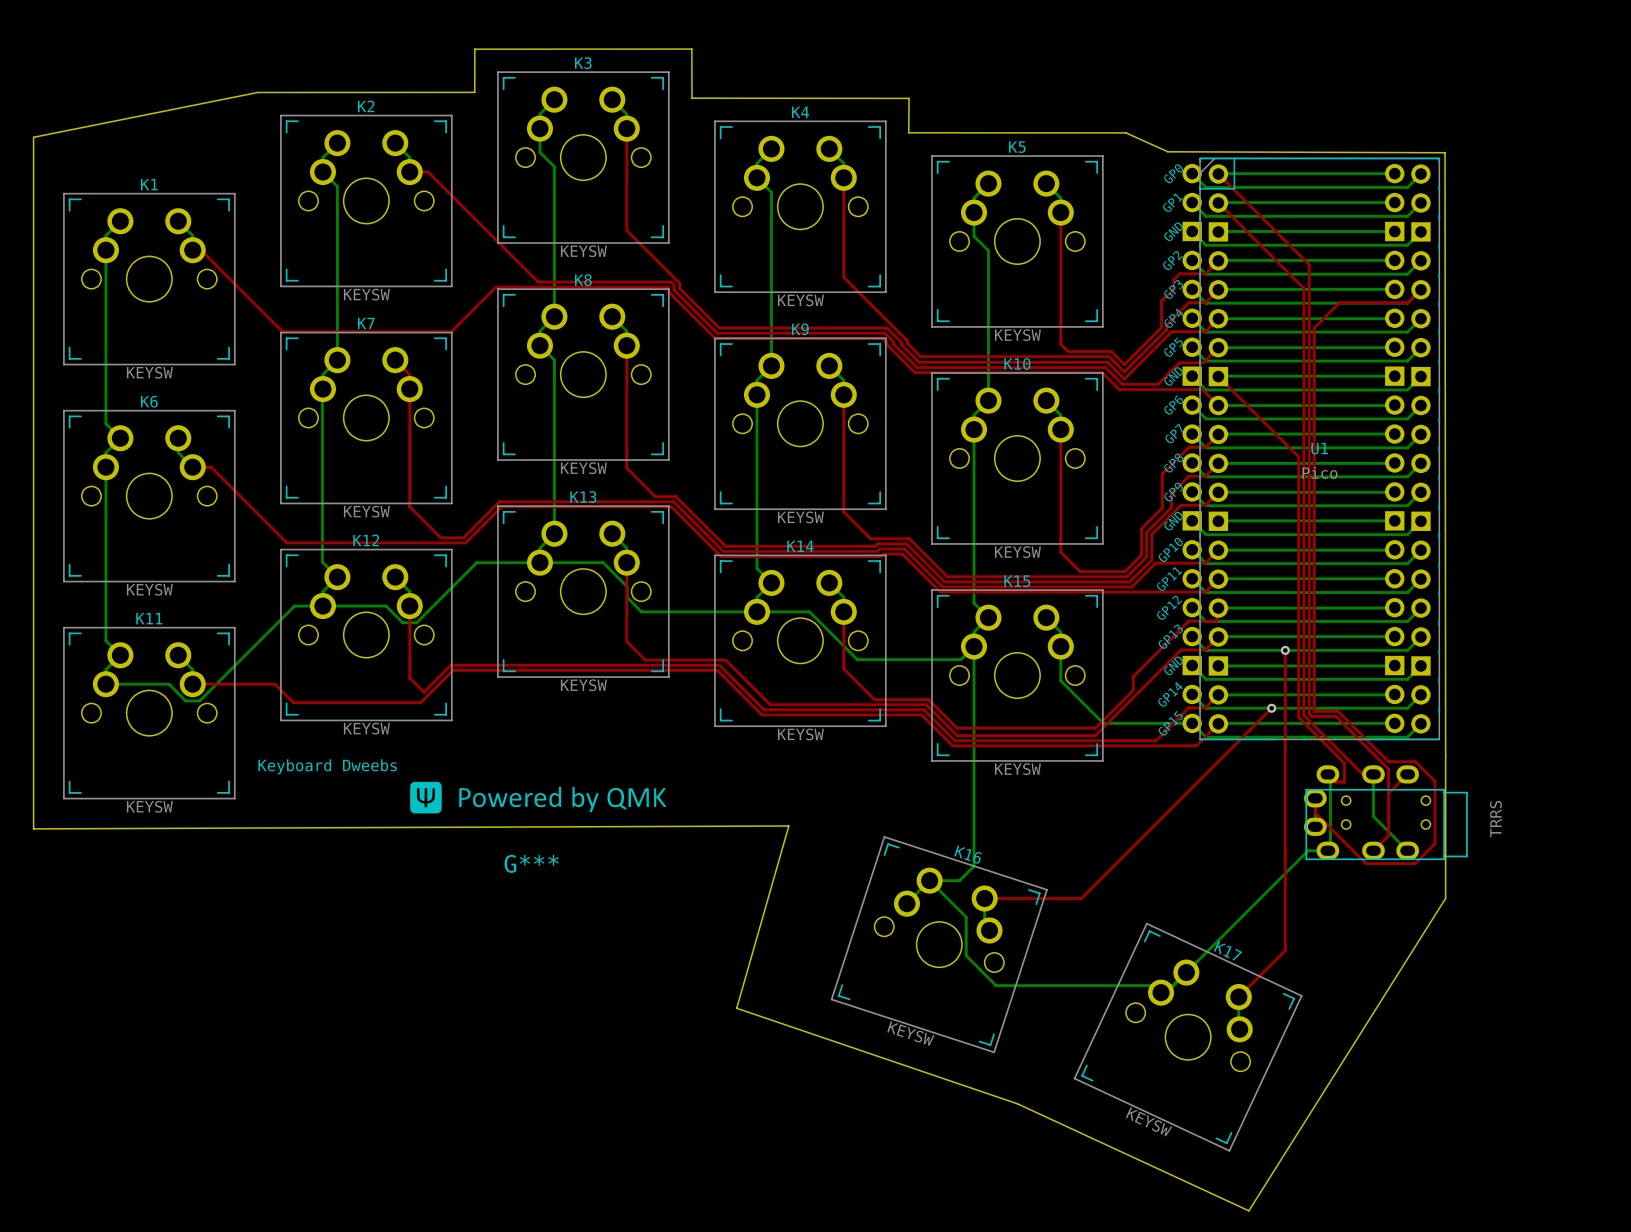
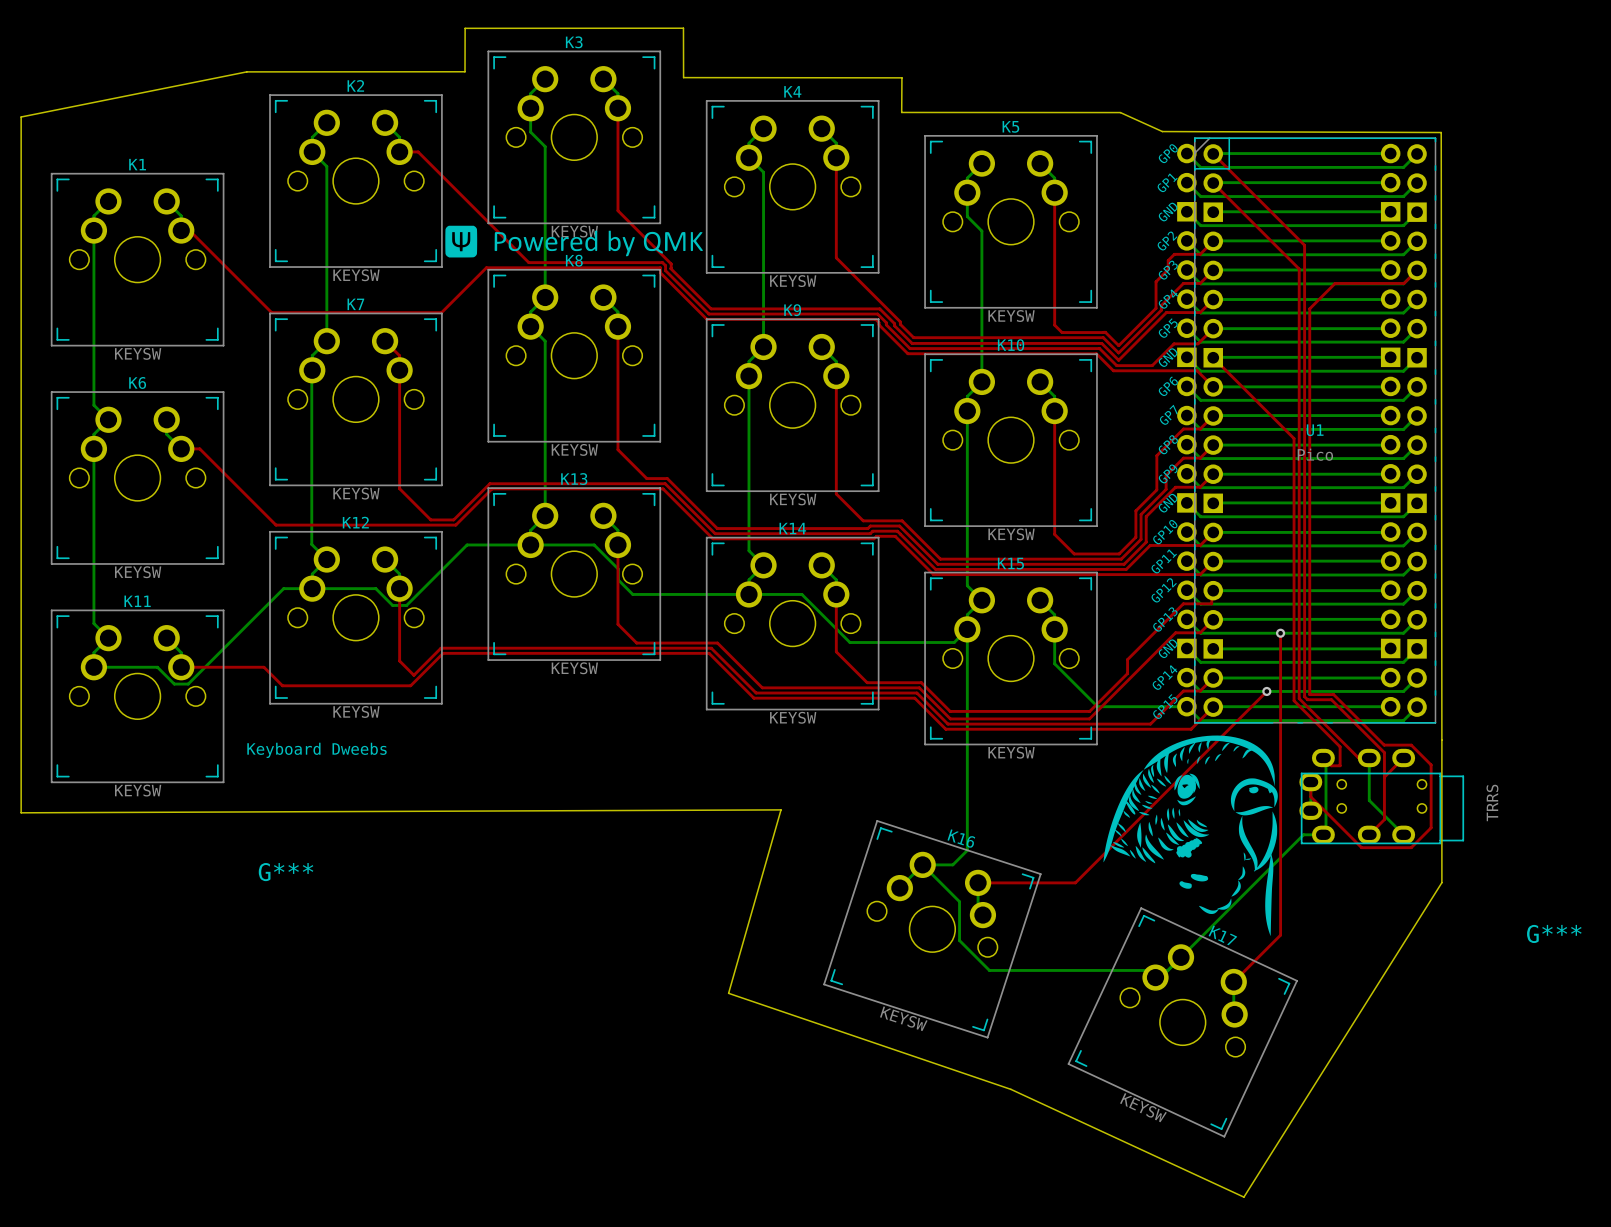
G***: none -> (574, 241)
G***: (538, 797) -> none
G***: none -> (1190, 835)

